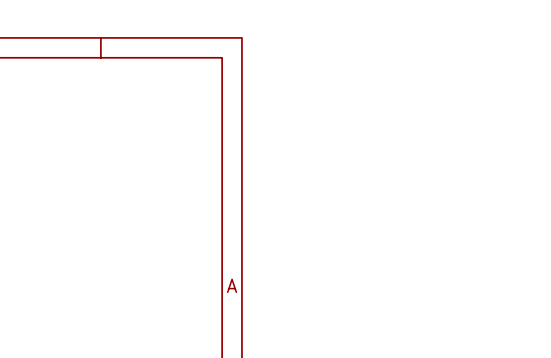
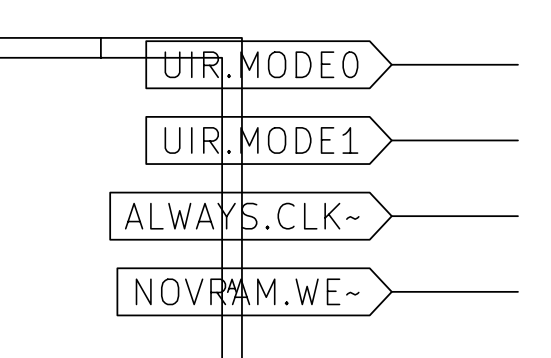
global label: none -> UIR.MODE0 (261, 64)
wire: none -> (391, 64) (517, 64)
global label: none -> UIR.MODE1 (261, 140)
wire: none -> (391, 140) (517, 140)
global label: none -> ALWAYS.CLK~ (242, 216)
wire: none -> (391, 216) (517, 216)
global label: none -> NOVRAM.WE~ (247, 291)
wire: none -> (391, 291) (517, 291)

